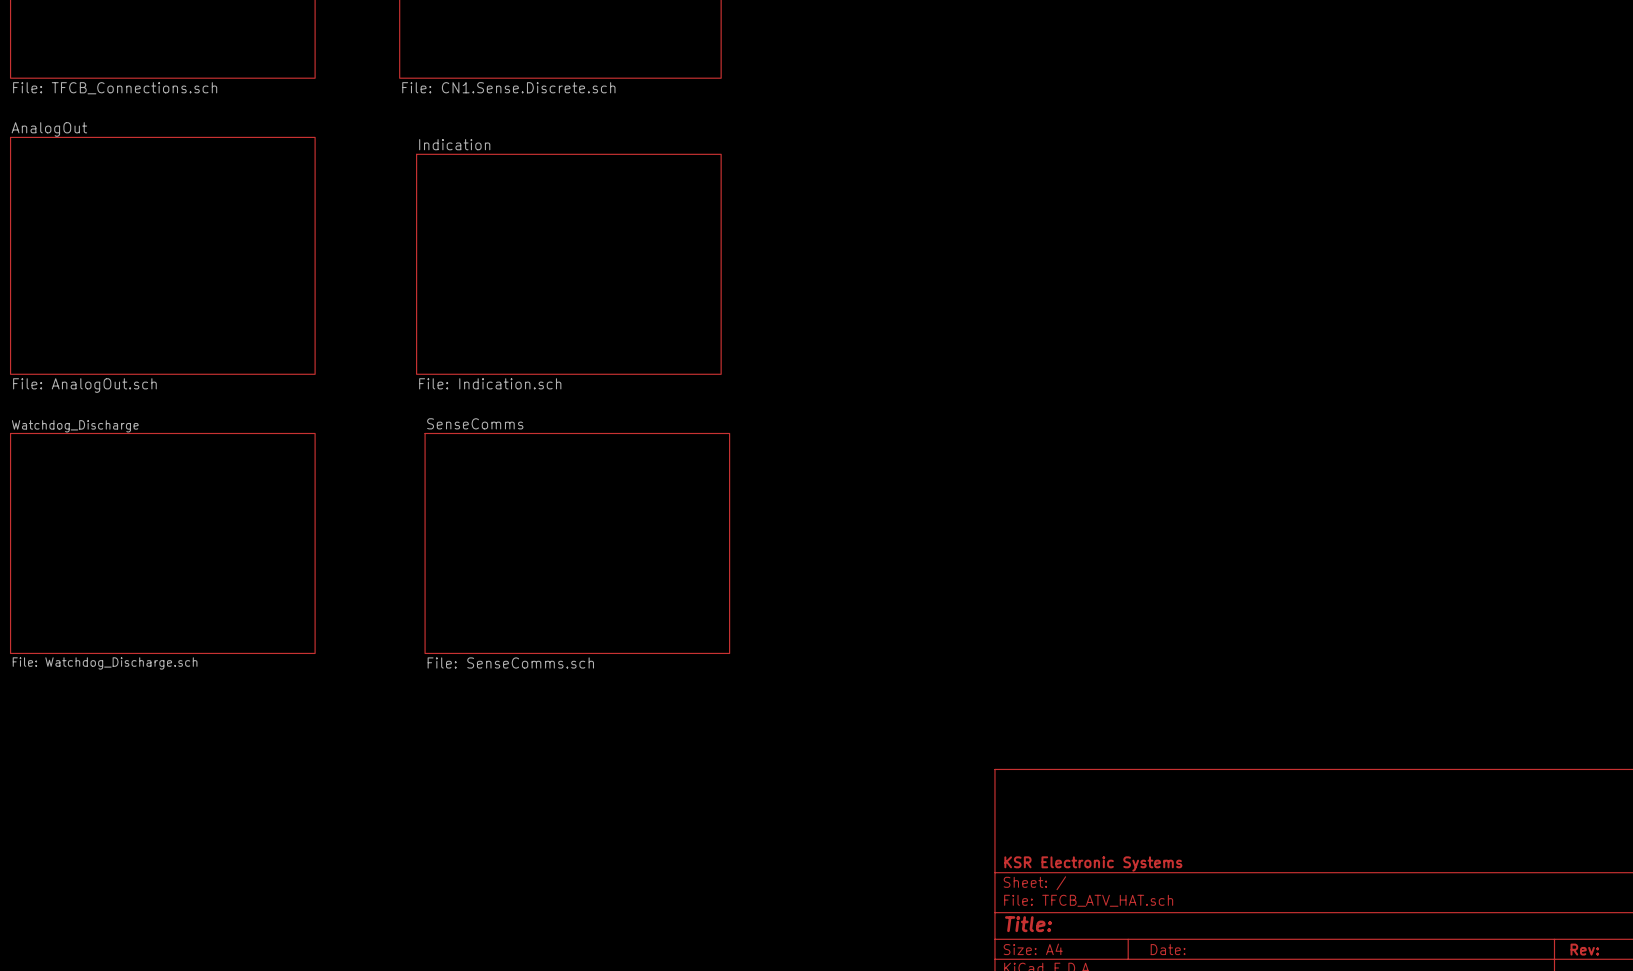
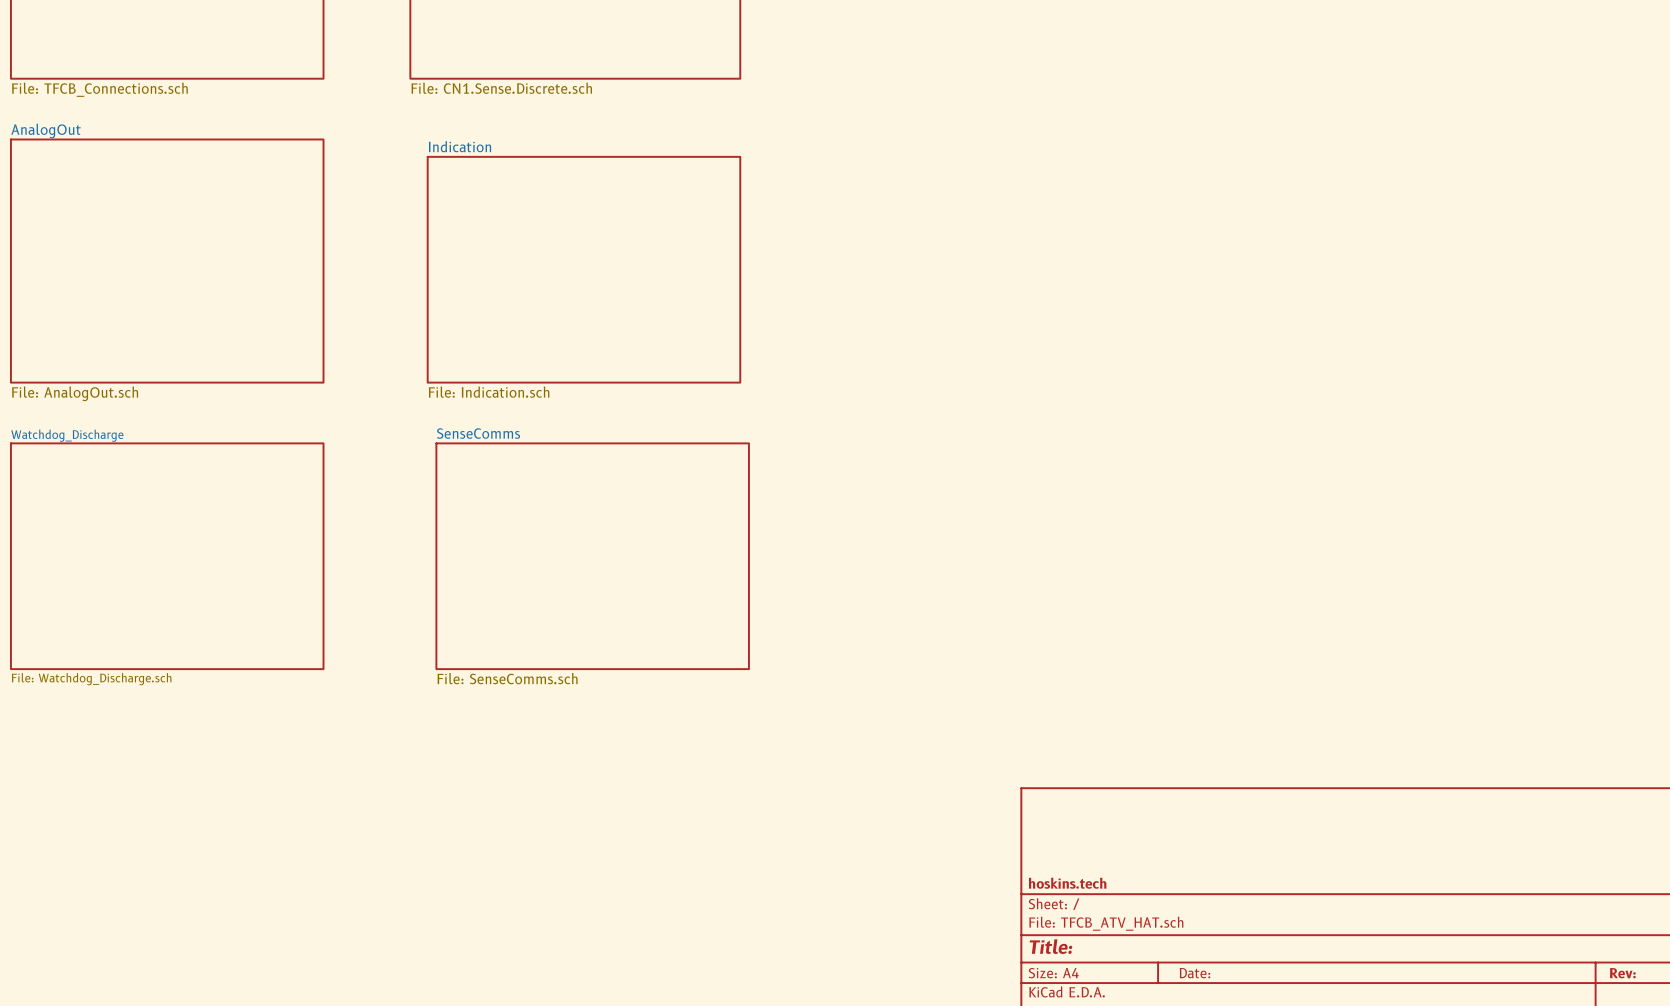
title block: KSR Electronic Systems (1093, 863) -> hoskins.tech (1067, 883)

